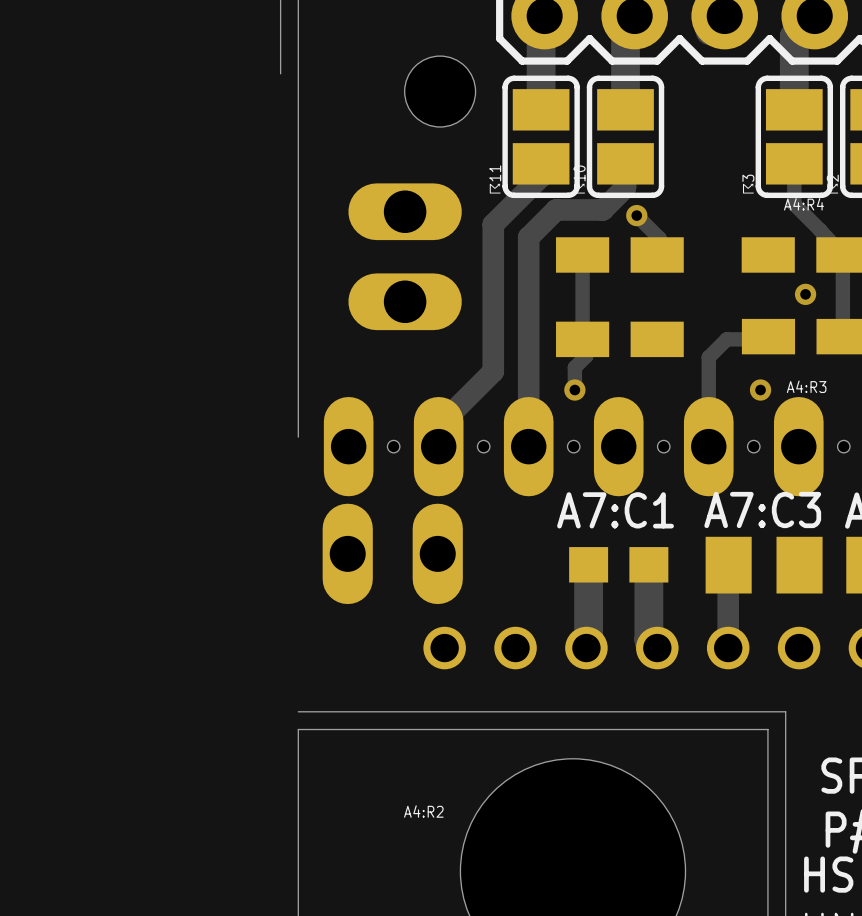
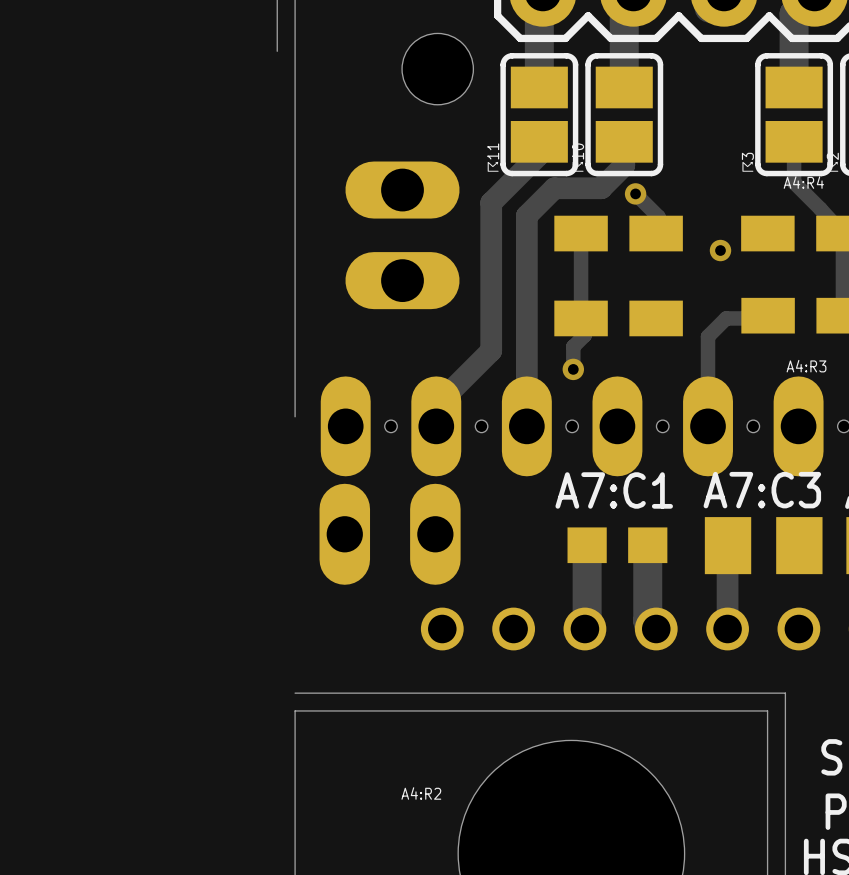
via: none -> (720, 250)
via: (805, 294) -> none
via: (760, 390) -> none

